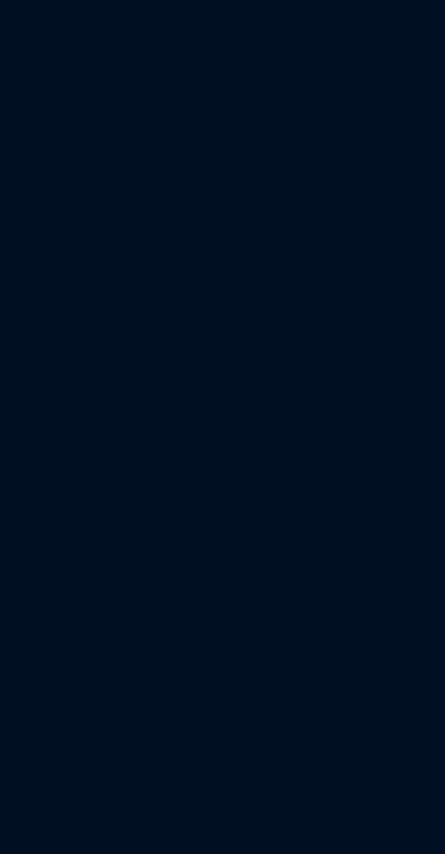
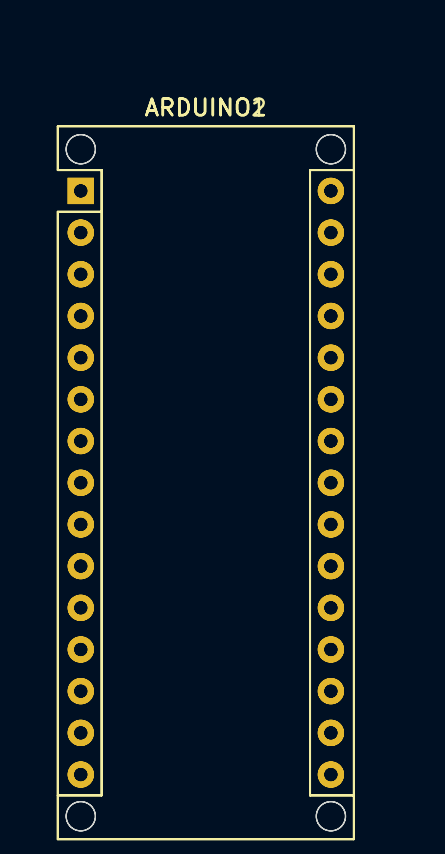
part: none -> (205, 482)
part: none -> (205, 482)

